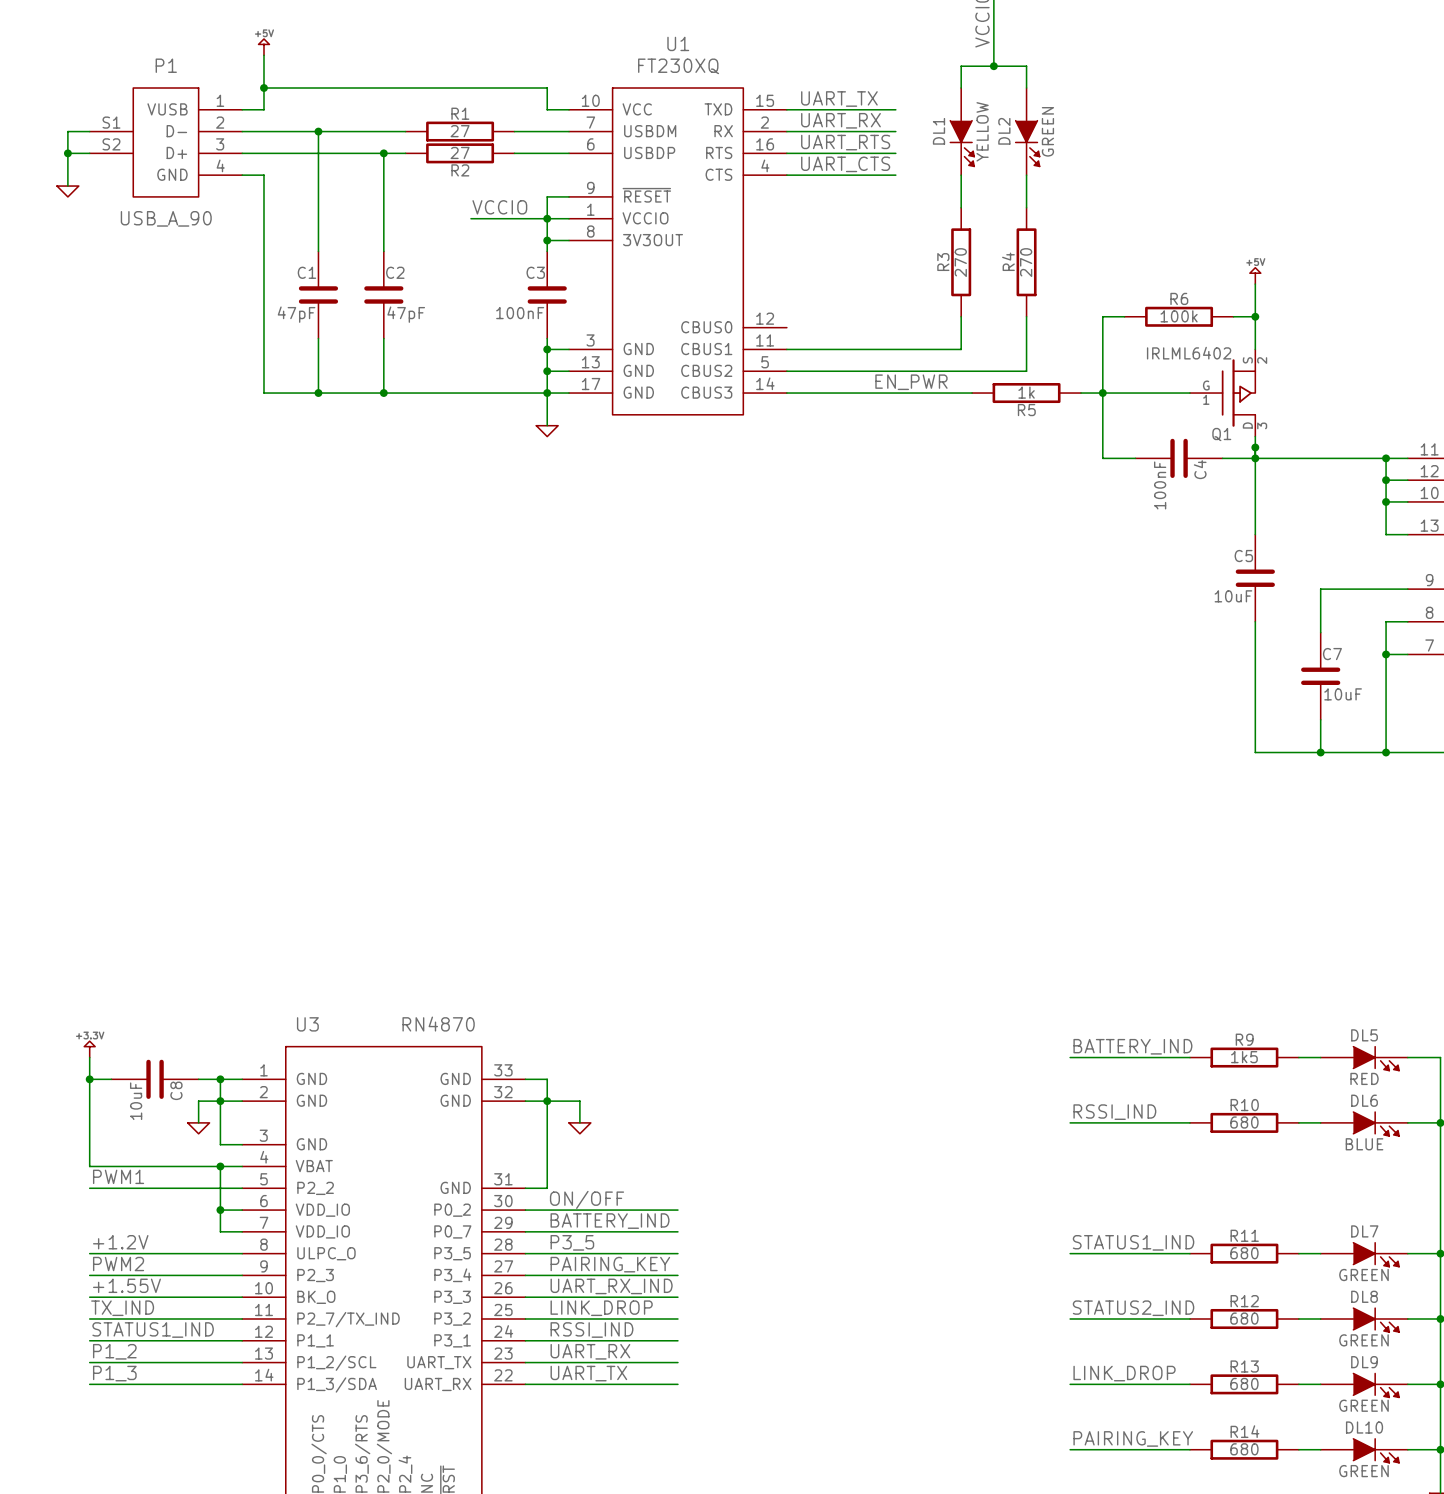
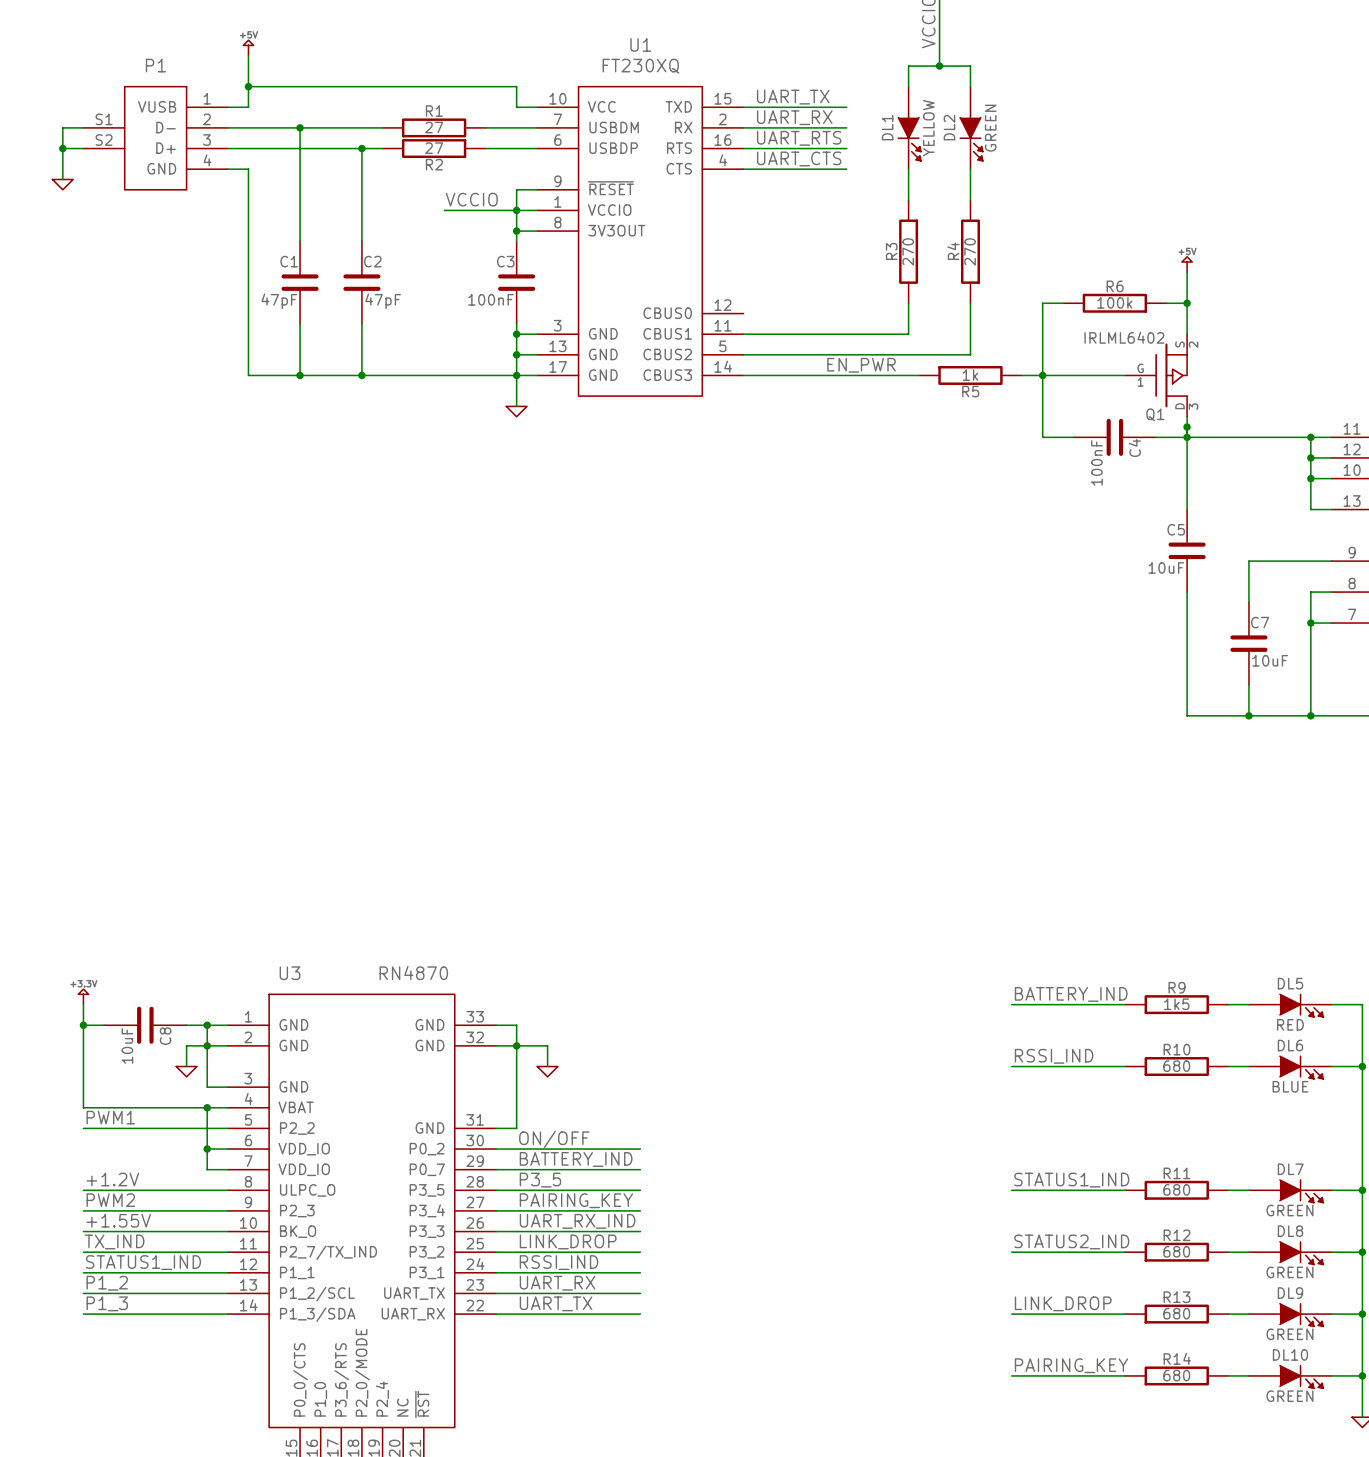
P1 value: USB_A_90 (166, 218) -> none

